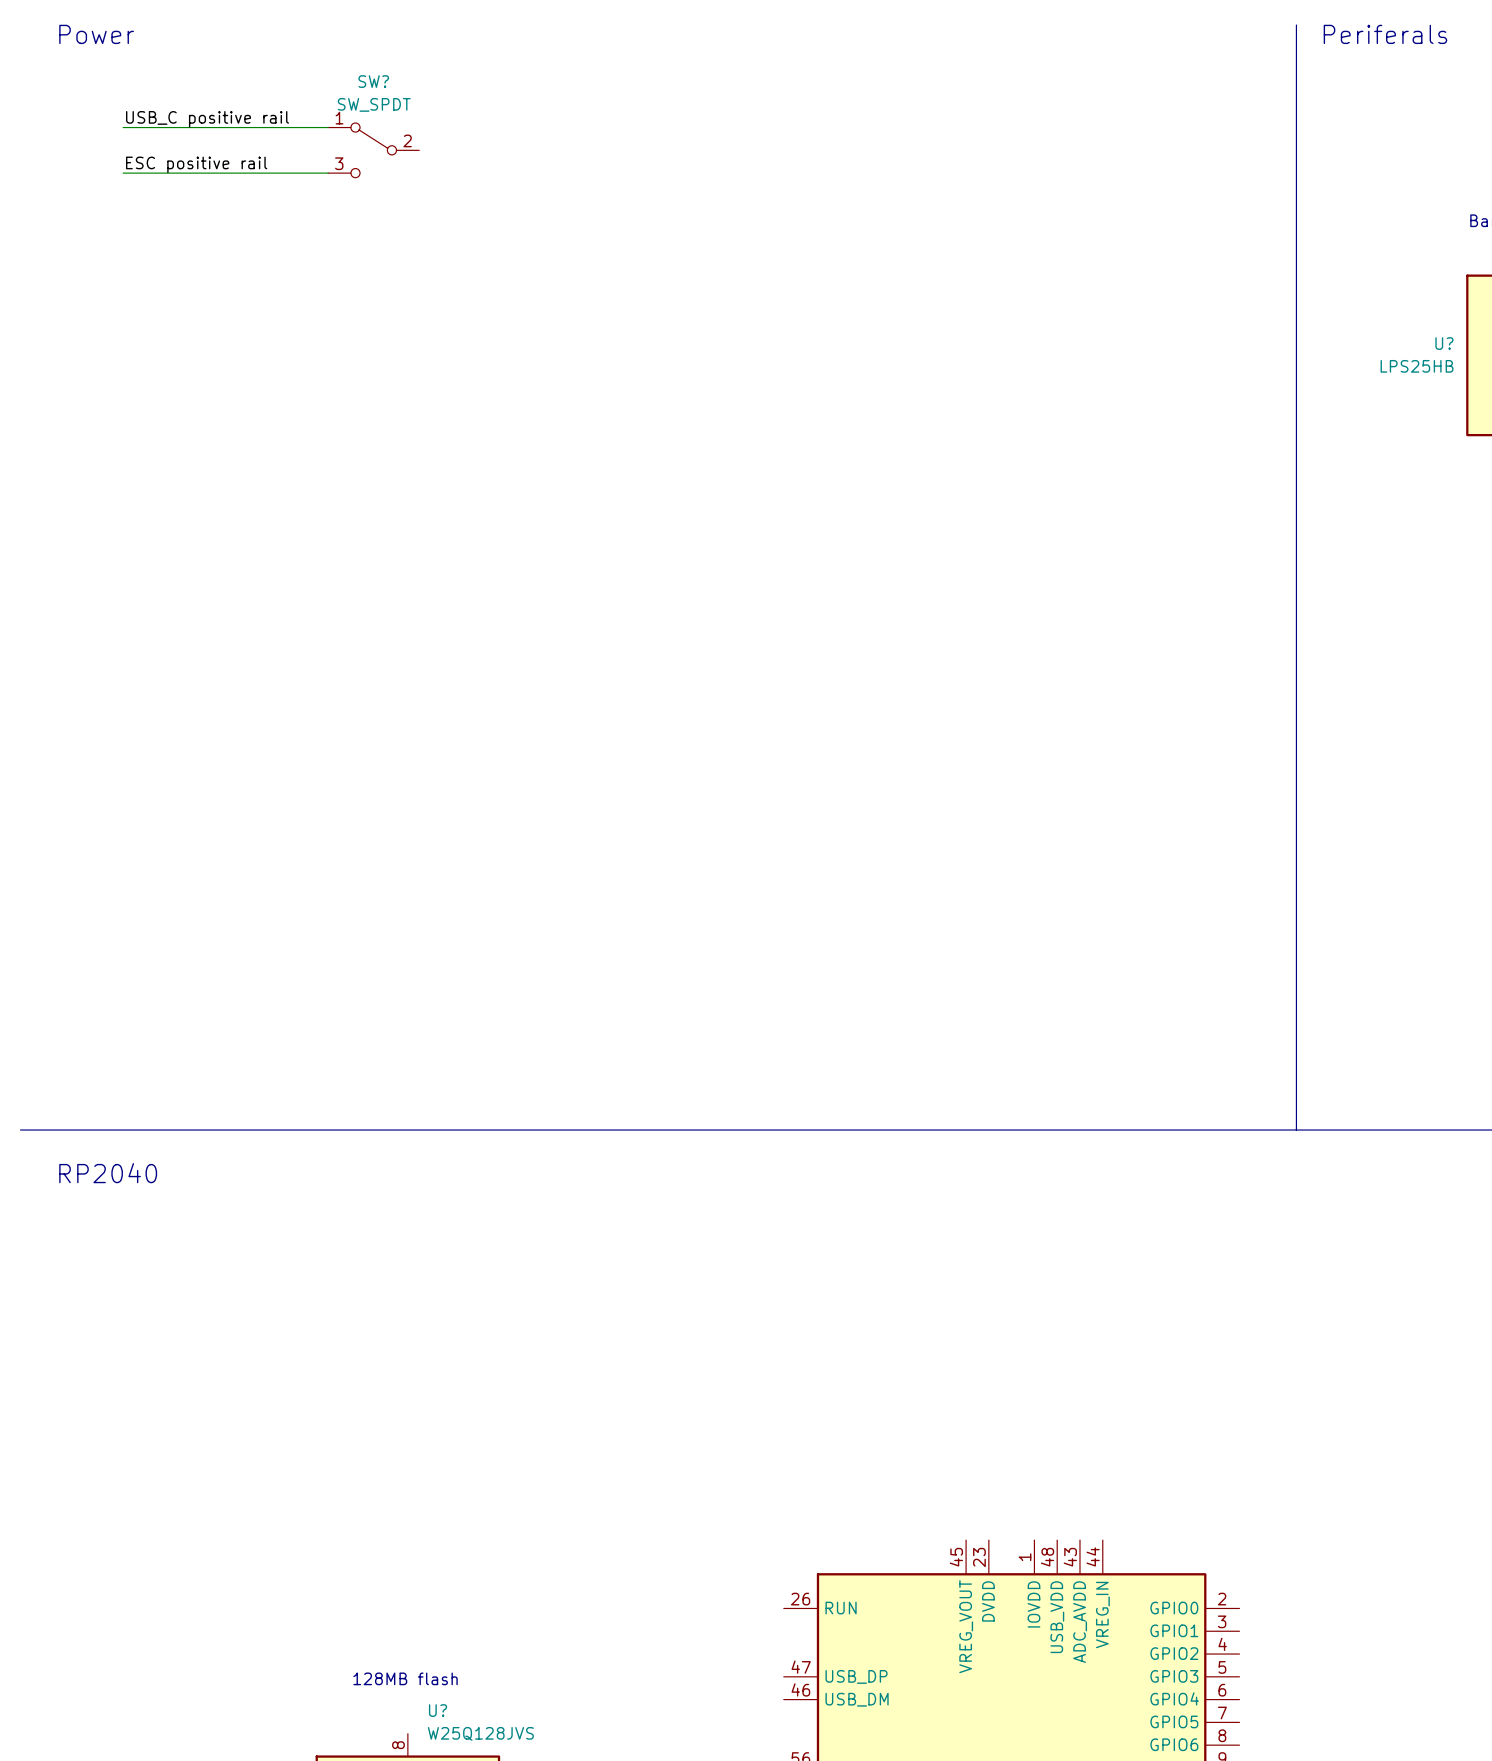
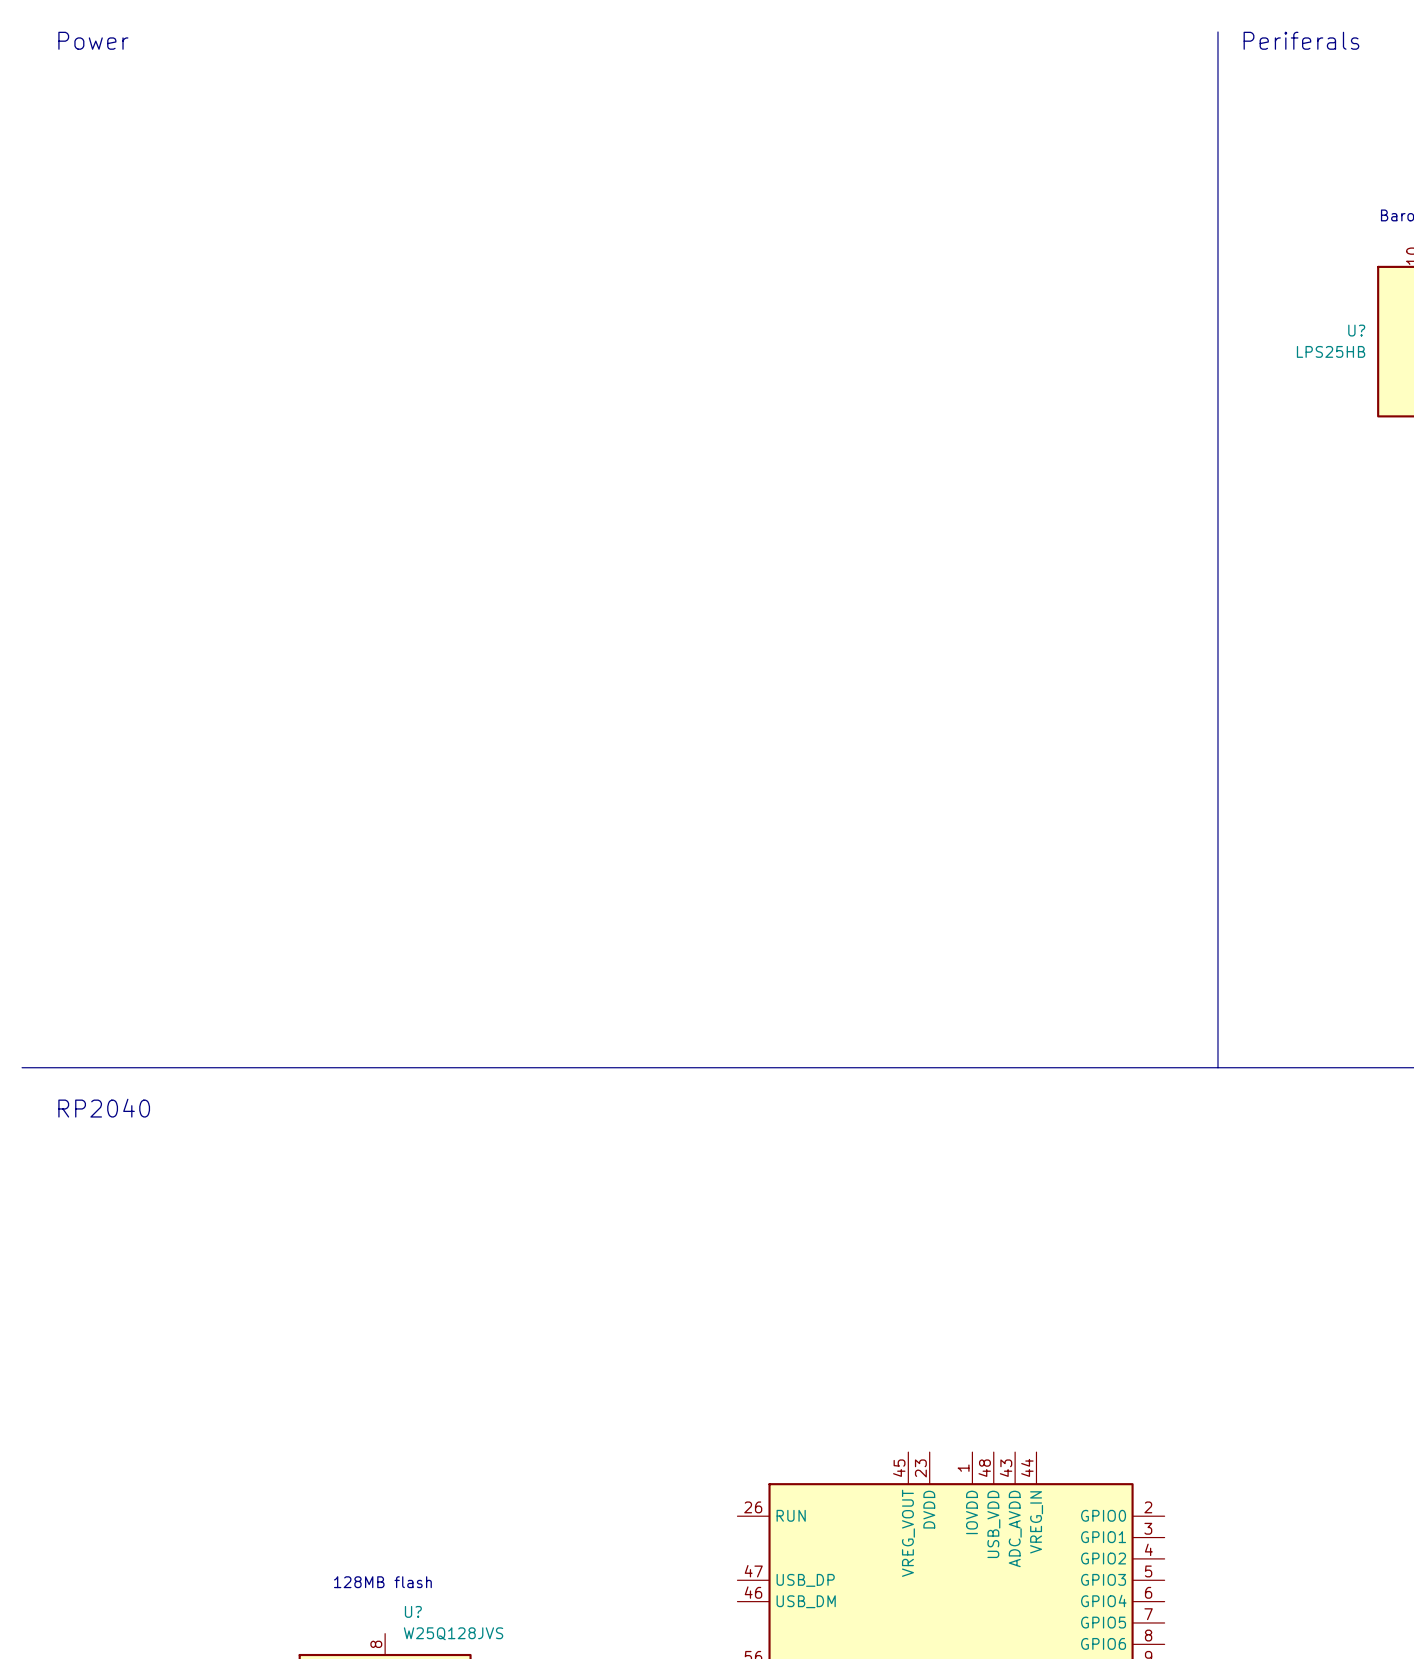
label: USB_C positive rail (207, 119) -> none
wire: (123, 127) (328, 127) -> none
SW?: SW_SPDT (373, 150) -> none
label: ESC positive rail (196, 164) -> none
wire: (123, 173) (328, 173) -> none

